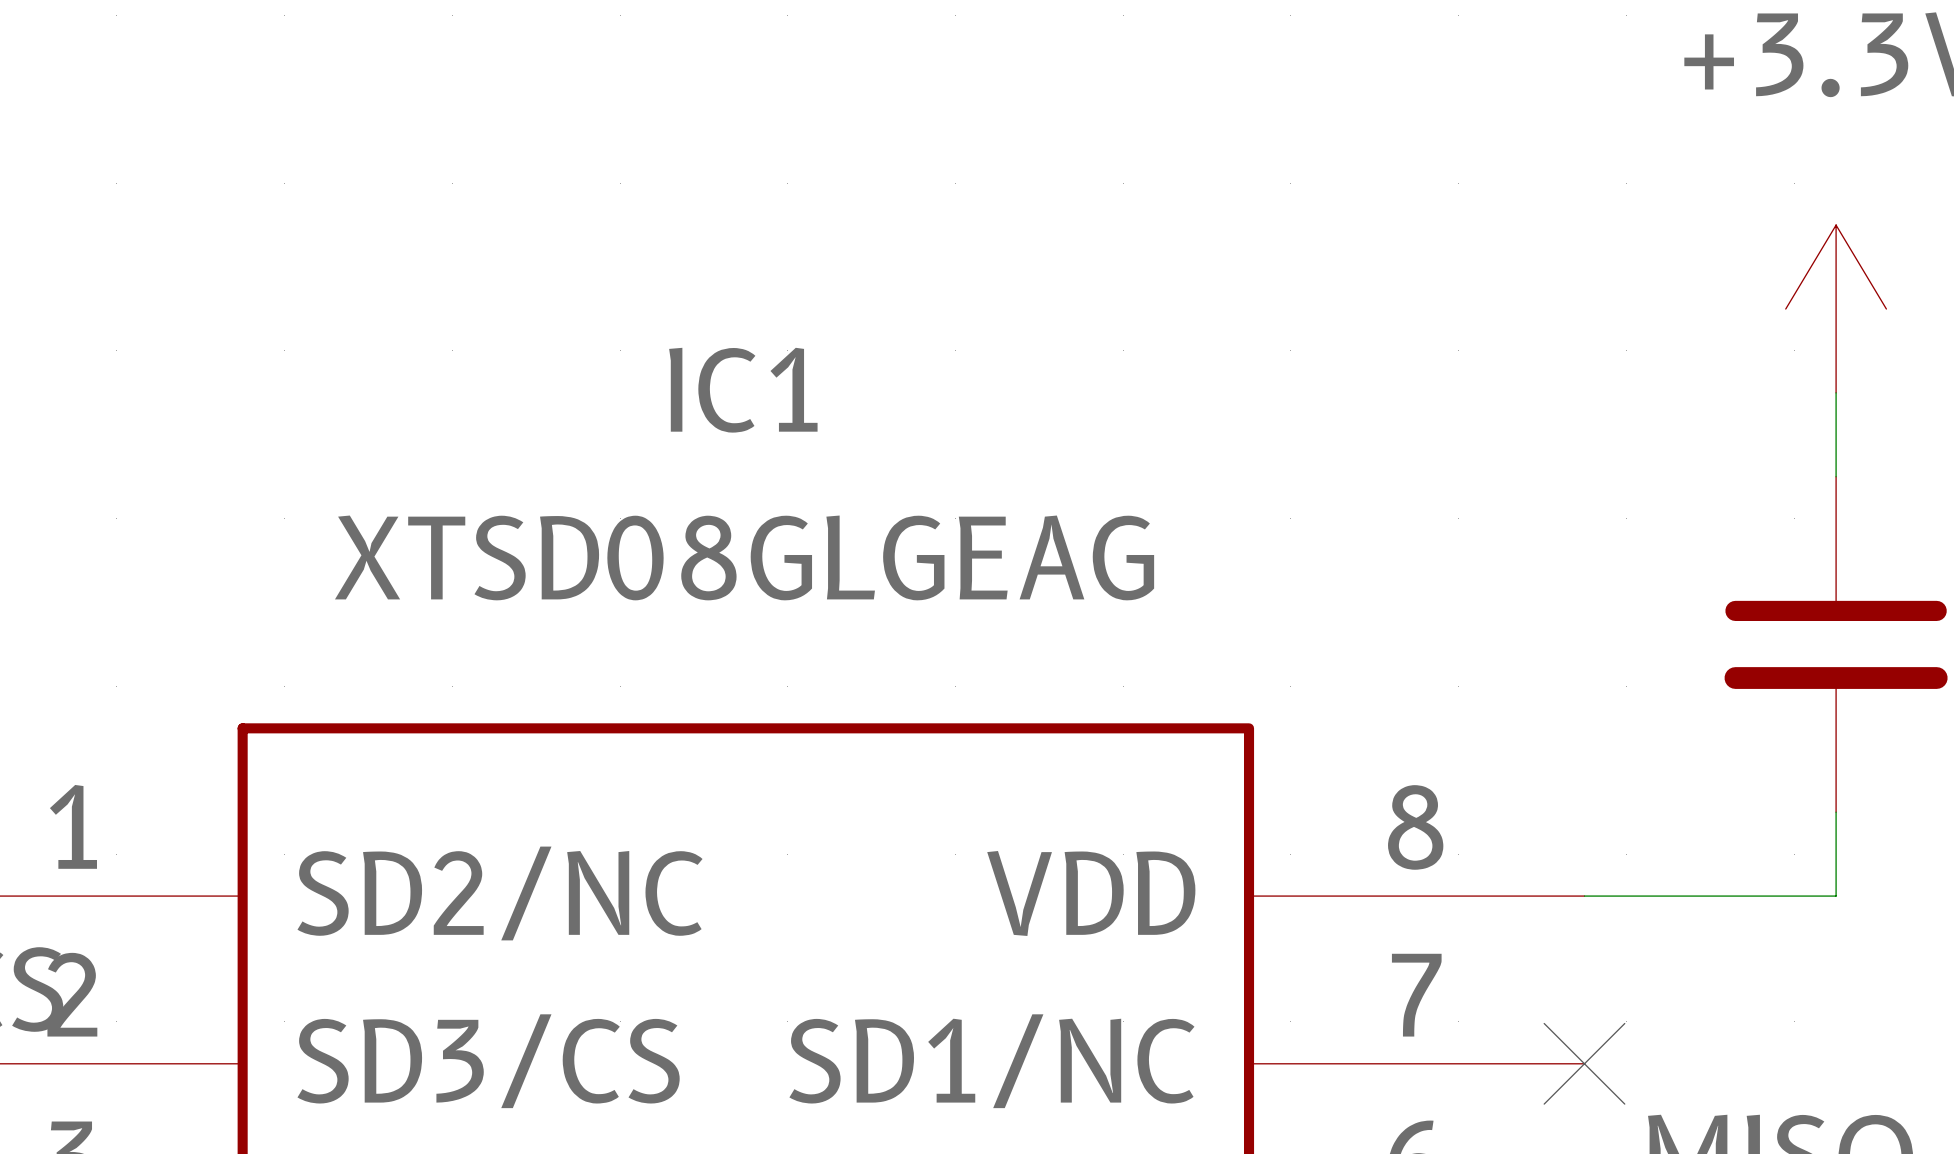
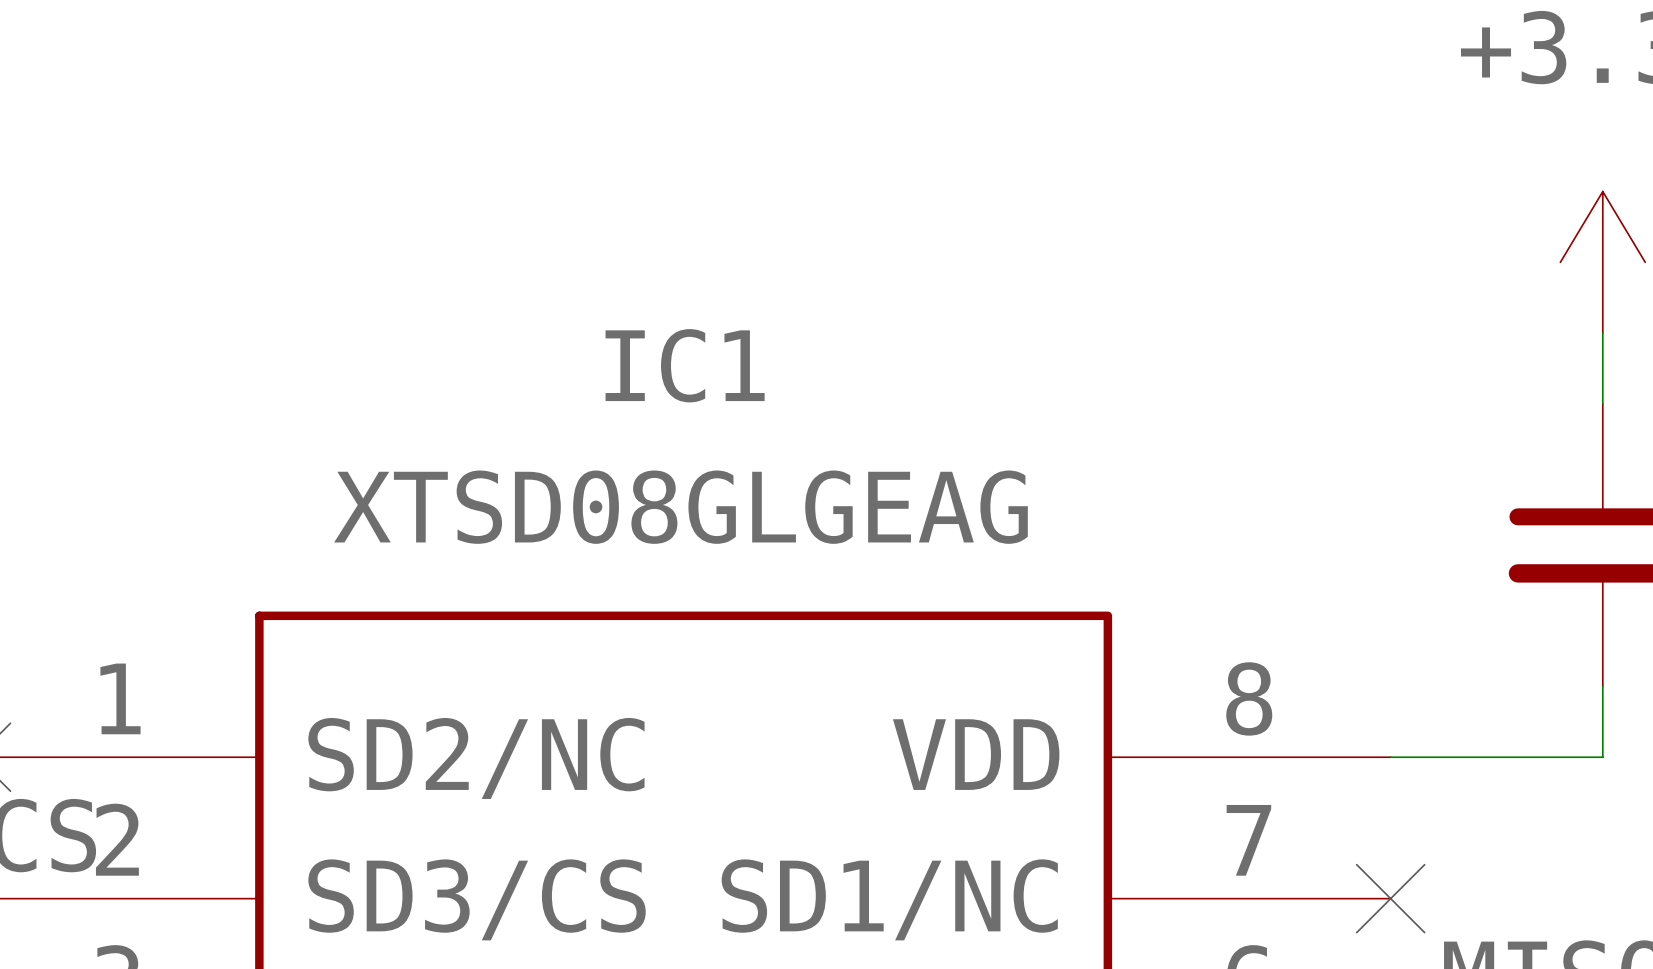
IC1 name position: IC1 (743, 390) -> IC1 (685, 365)
IC1 value position: XTSD08GLGEAG (744, 557) -> XTSD08GLGEAG (680, 507)

